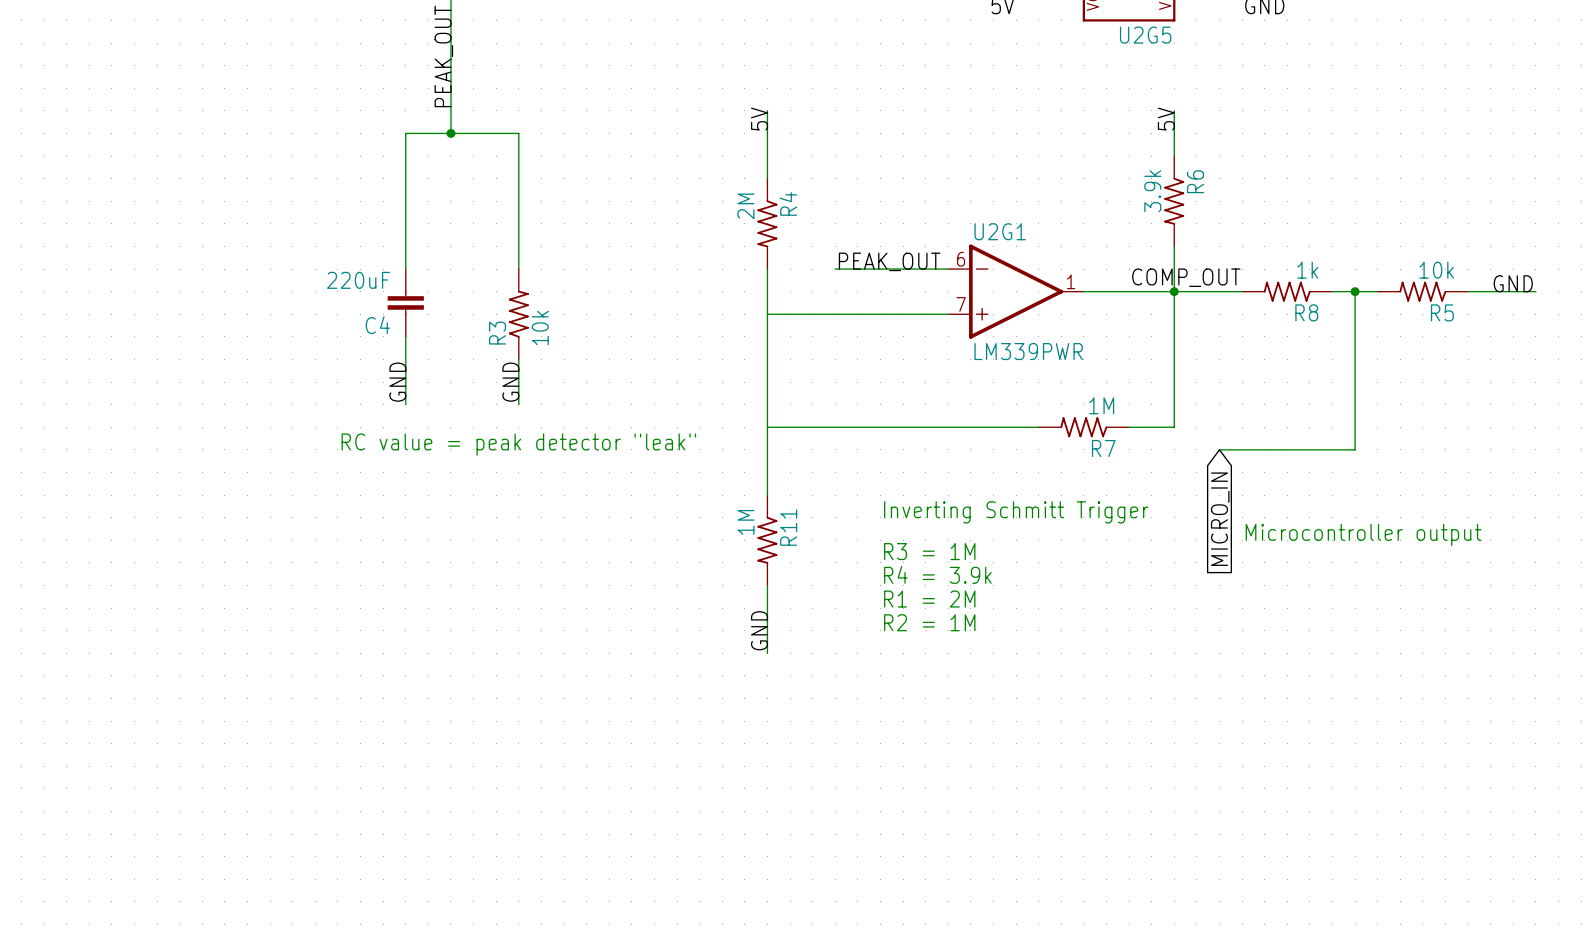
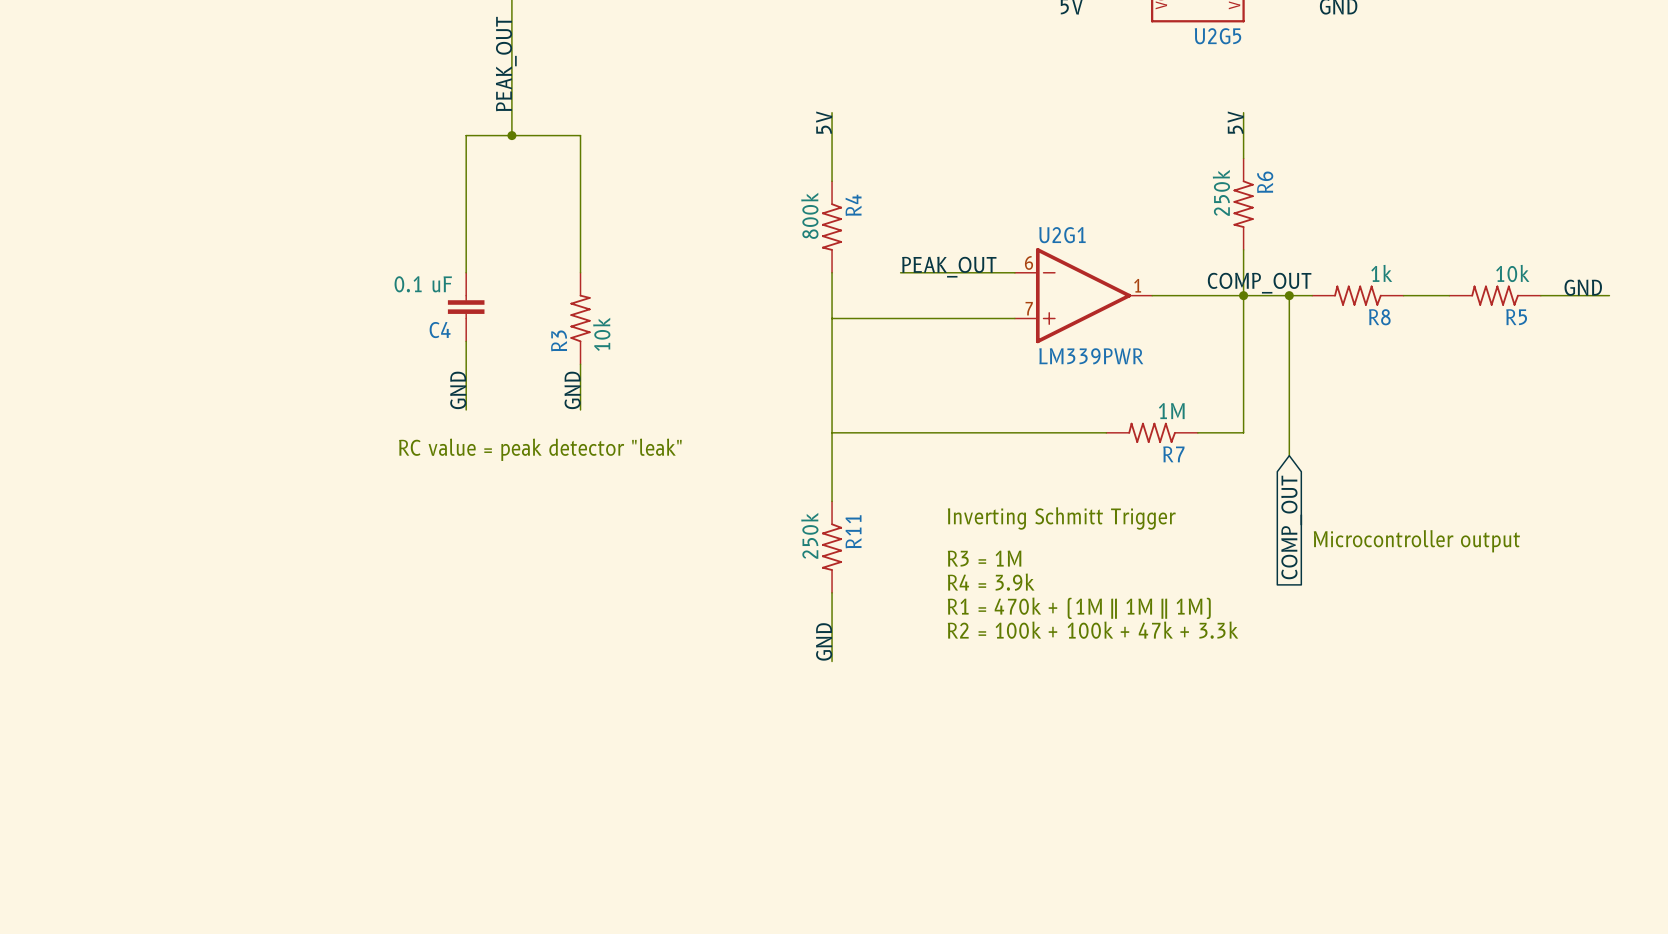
R6 value: 3.9k (1152, 191) -> 250k (1221, 192)
R4 value: 2M (745, 206) -> 800k (809, 215)
C4 value: 220uF (358, 280) -> 0.1 uF (423, 284)
junction: none -> (1289, 295)
wire: (1355, 291) (1355, 449) (1219, 449) -> (1289, 295) (1289, 455)
junction: (1355, 291) -> none
global label: MICRO_IN (1220, 519) -> COMP_OUT (1291, 527)
R11 value: 1M (745, 522) -> 250k (809, 535)
text: R1 = 2M (929, 599) -> R1 = 470k + (1M || 1M || 1M) (1079, 608)
text: R2 = 1M (929, 622) -> R2 = 100k + 100k + 47k + 3.3k (1093, 630)

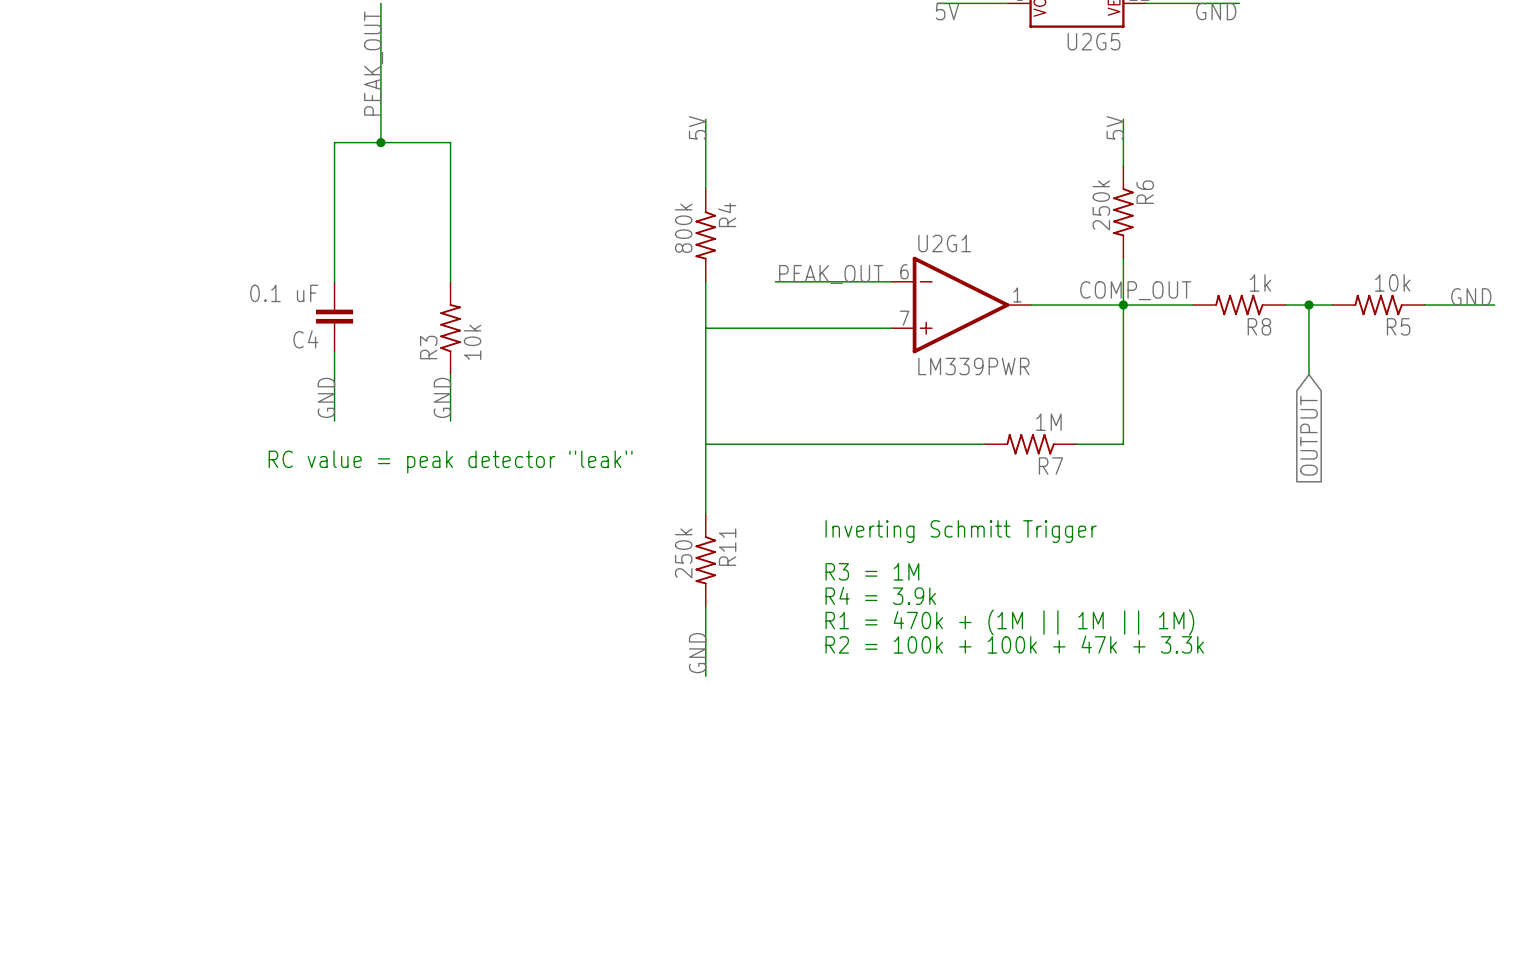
wire: (1289, 295) (1289, 455) -> none
junction: (1289, 295) -> none
wire: none -> (1309, 305) (1309, 374)
junction: none -> (1309, 305)
global label: none -> OUTPUT (1309, 435)
global label: COMP_OUT (1291, 527) -> none
text: Microcontroller output (1416, 541) -> none

